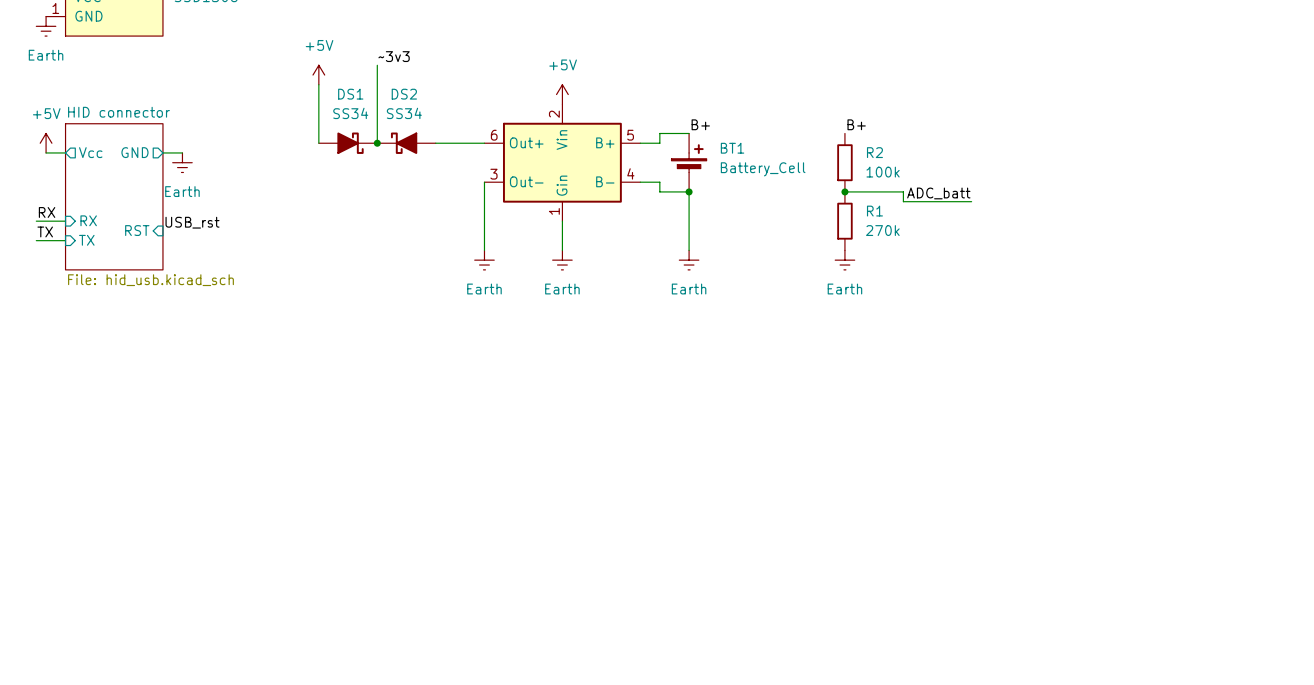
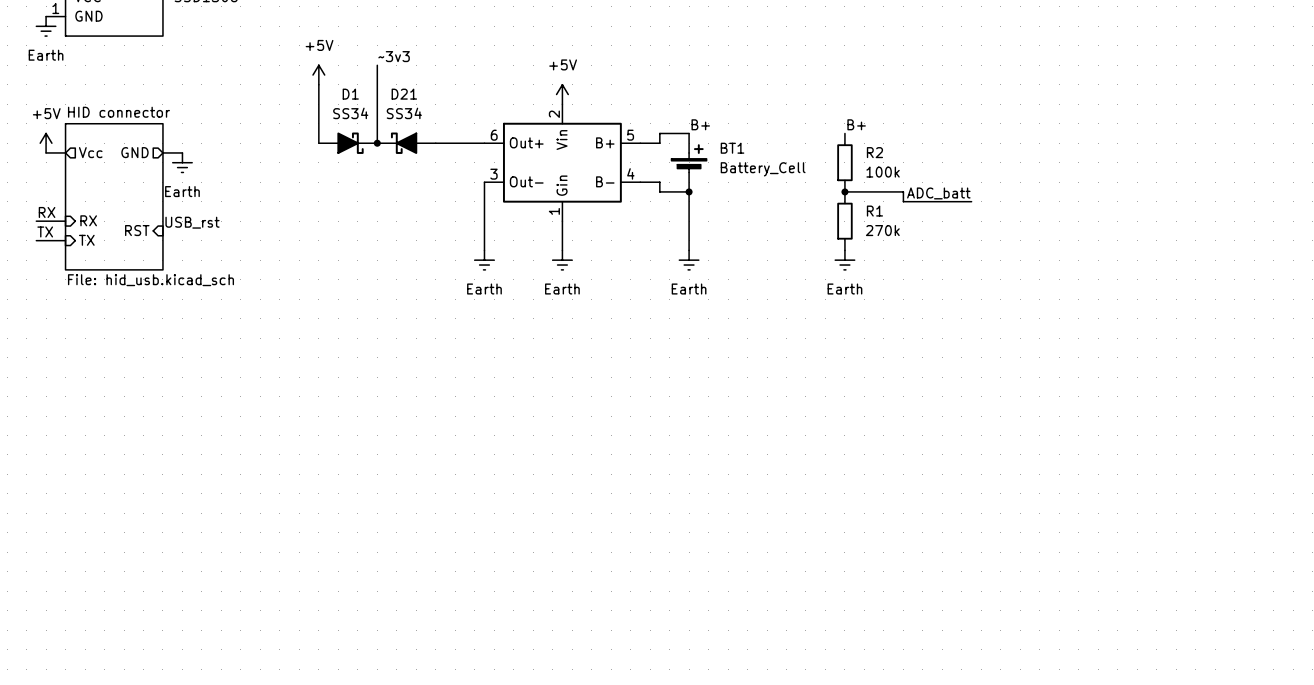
DS1 name: DS1 (350, 94) -> D1 (350, 94)
DS2 name: DS2 (404, 94) -> D21 (404, 94)

